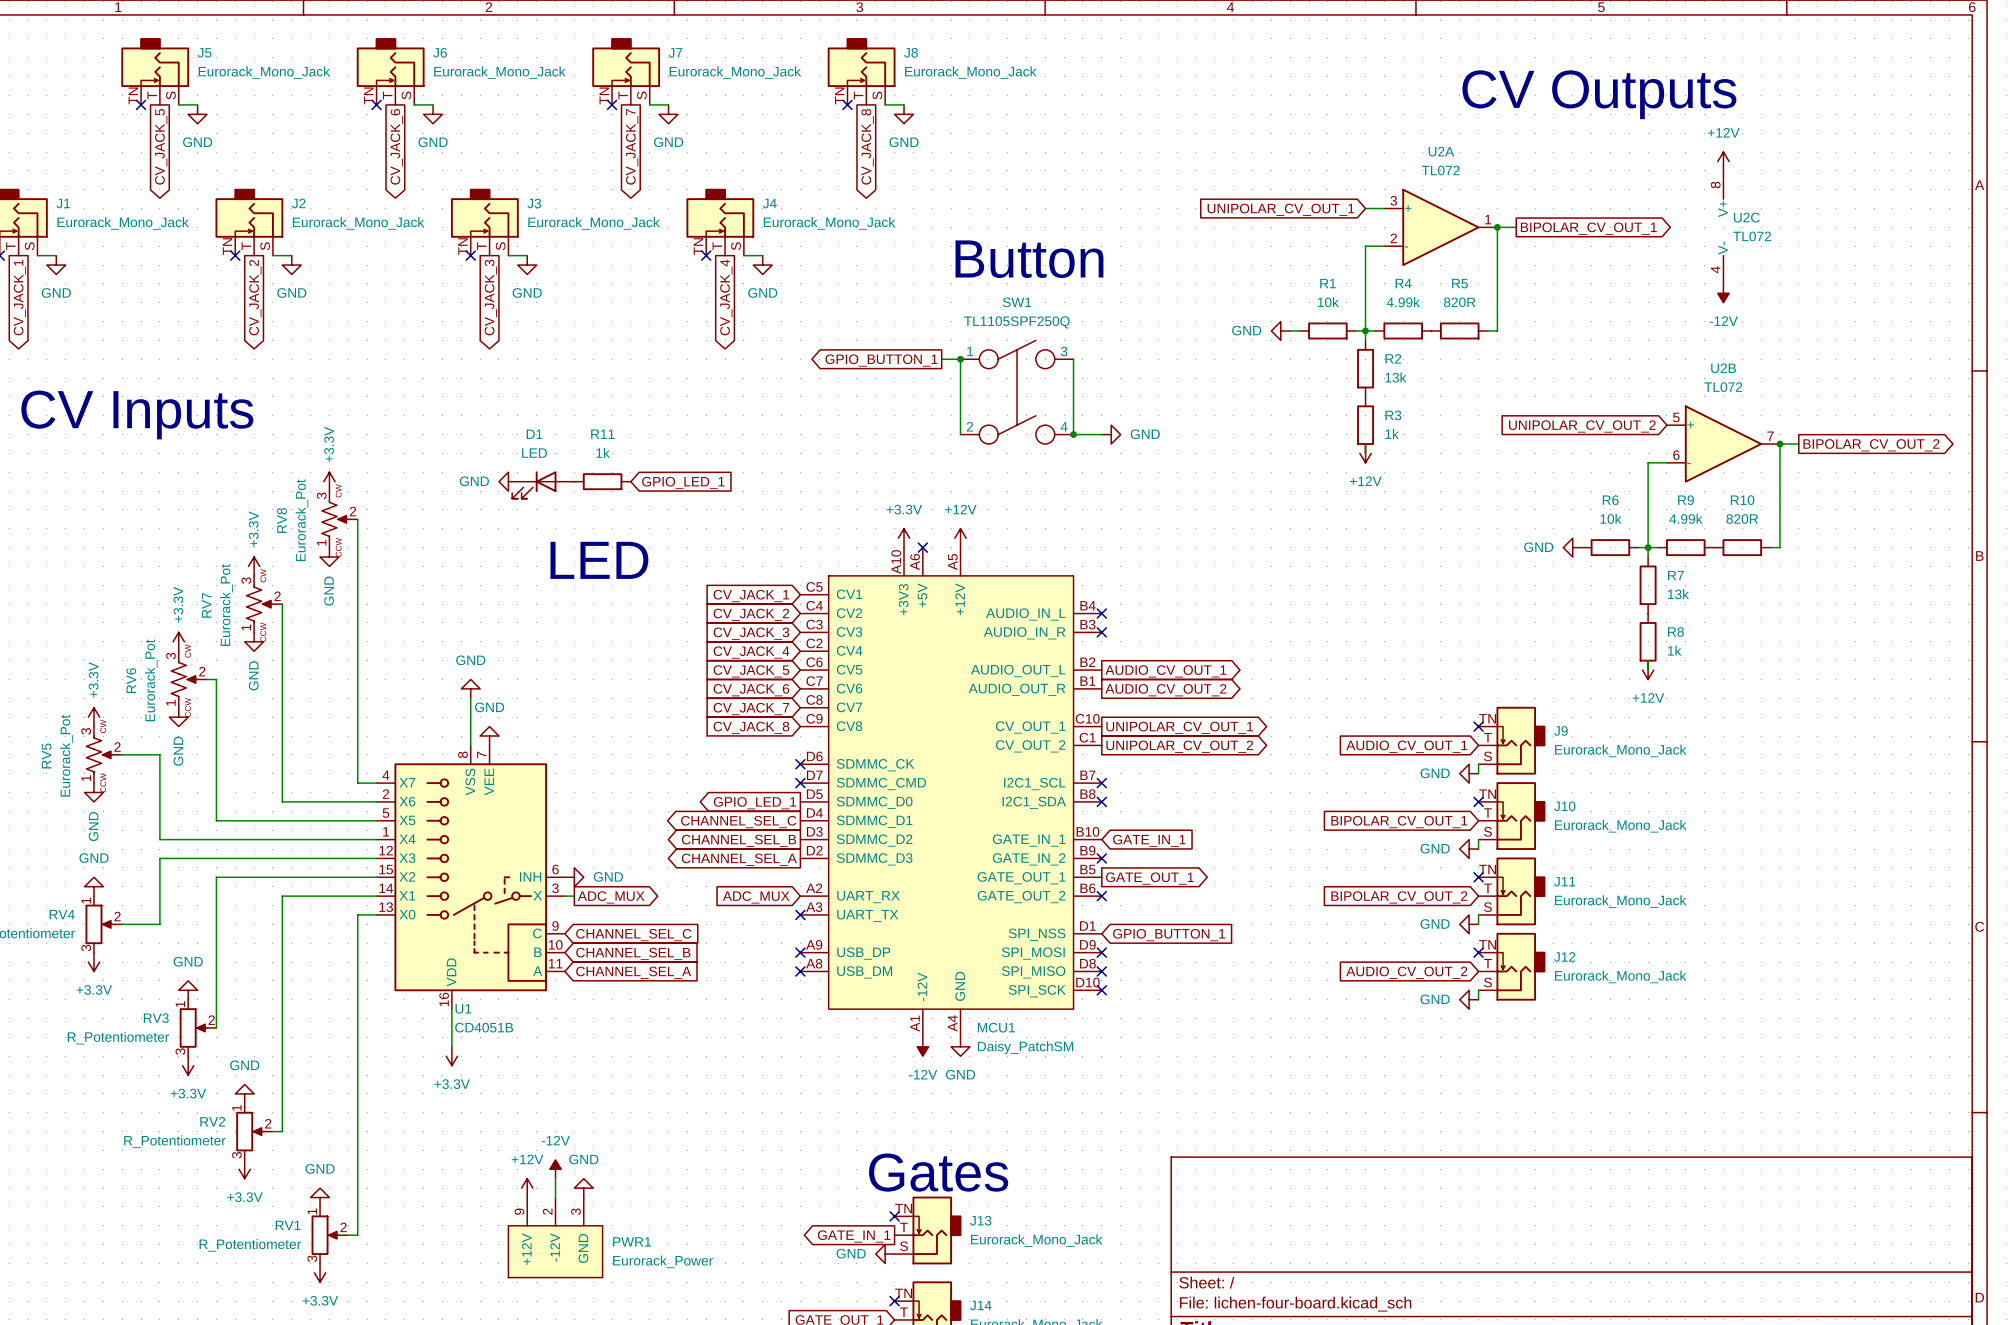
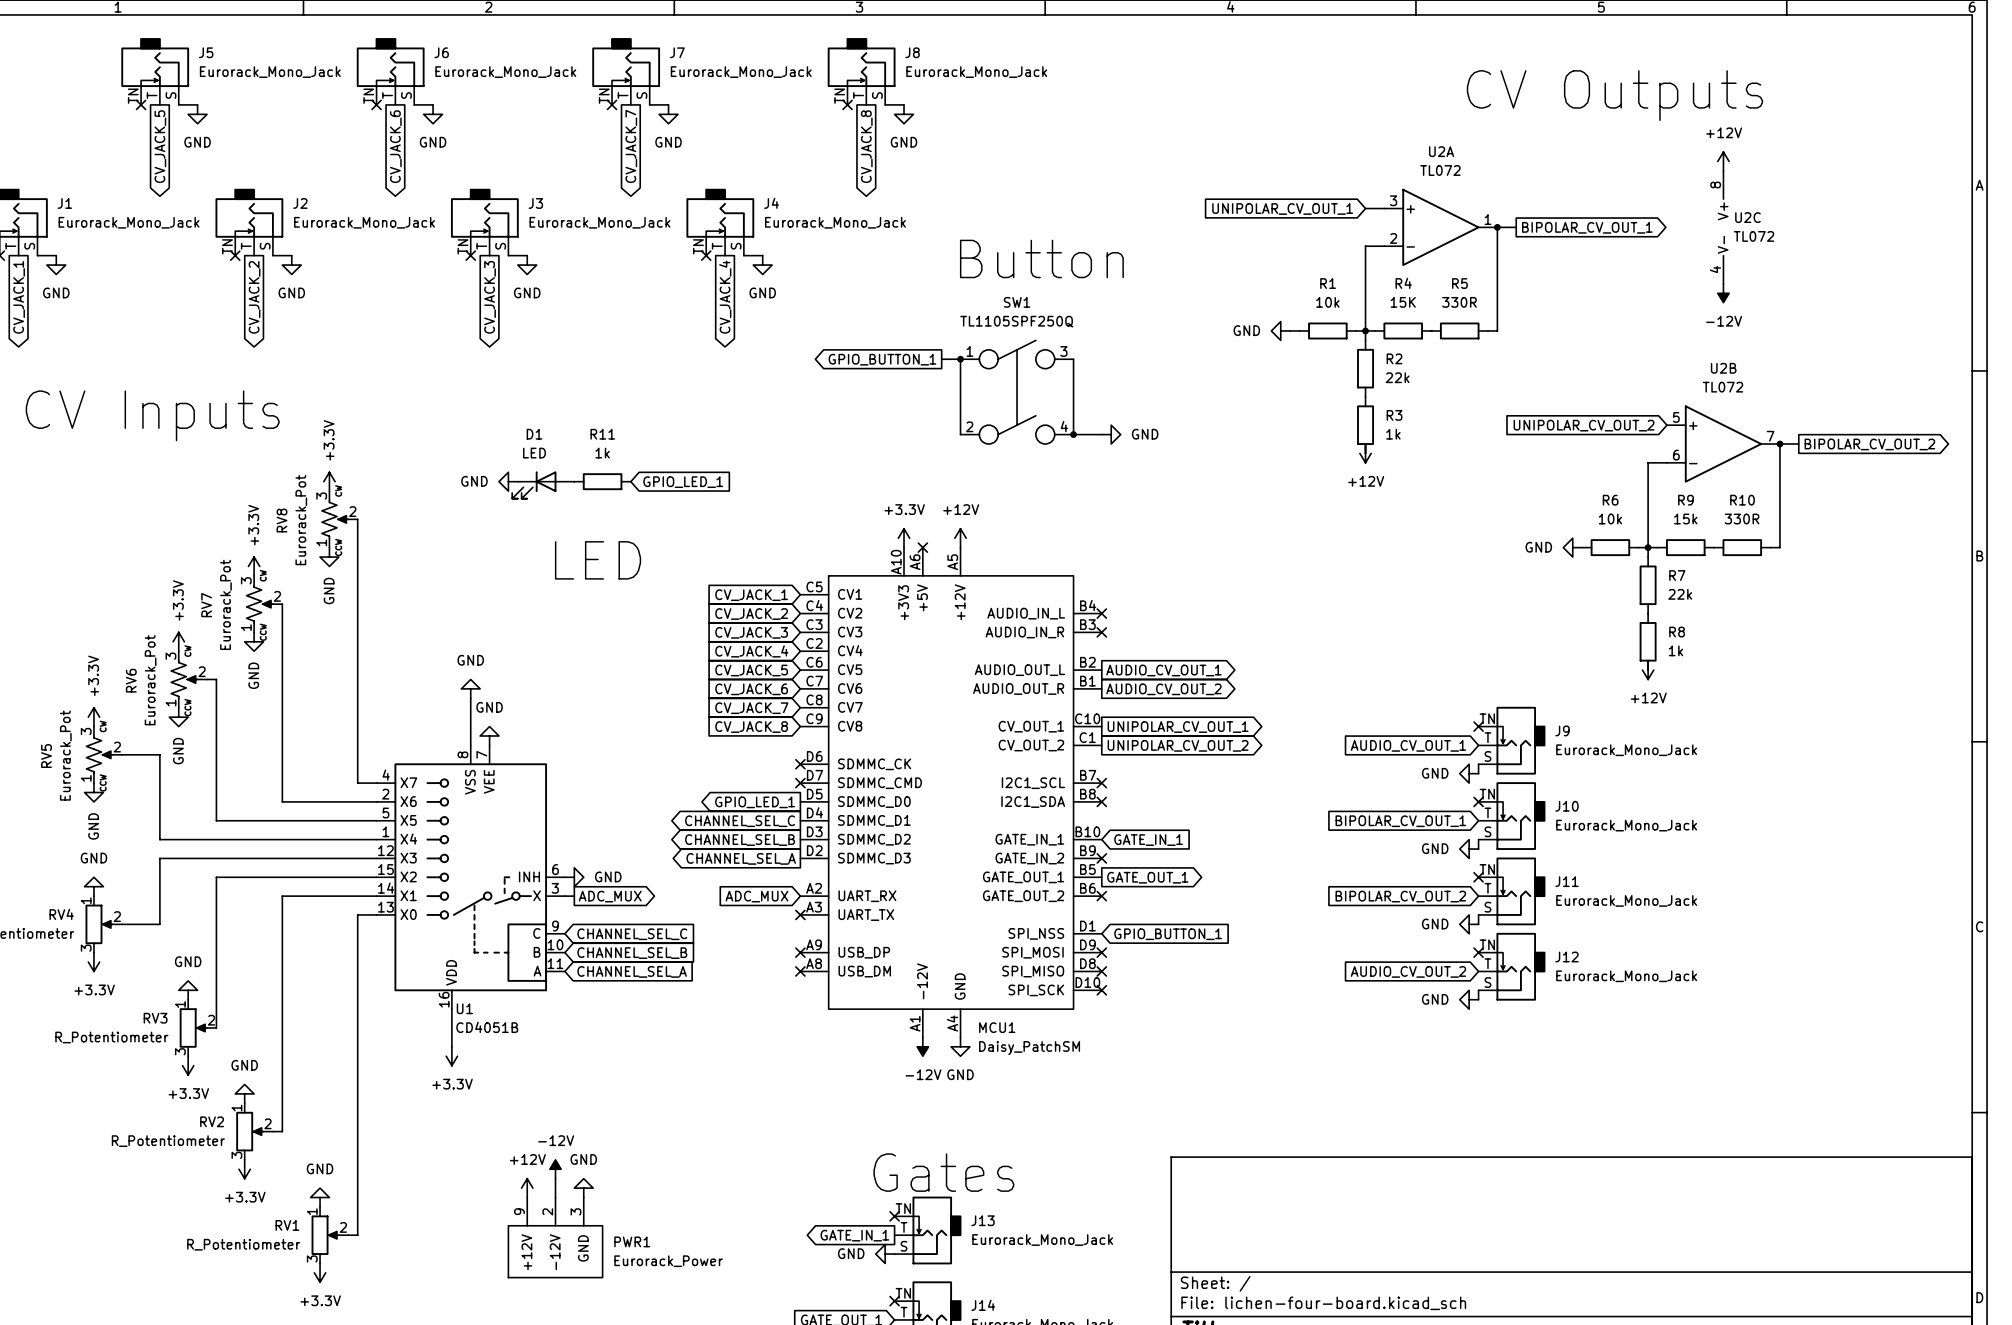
R4 text: 4.99k (1403, 302) -> 15K (1403, 302)
R5 text: 820R (1459, 302) -> 330R (1459, 302)
R2 text: 13k (1395, 377) -> 22k (1397, 377)
R9 text: 4.99k (1685, 518) -> 15k (1685, 519)
R10 text: 820R (1742, 519) -> 330R (1742, 519)
R7 text: 13k (1678, 594) -> 22k (1680, 594)

